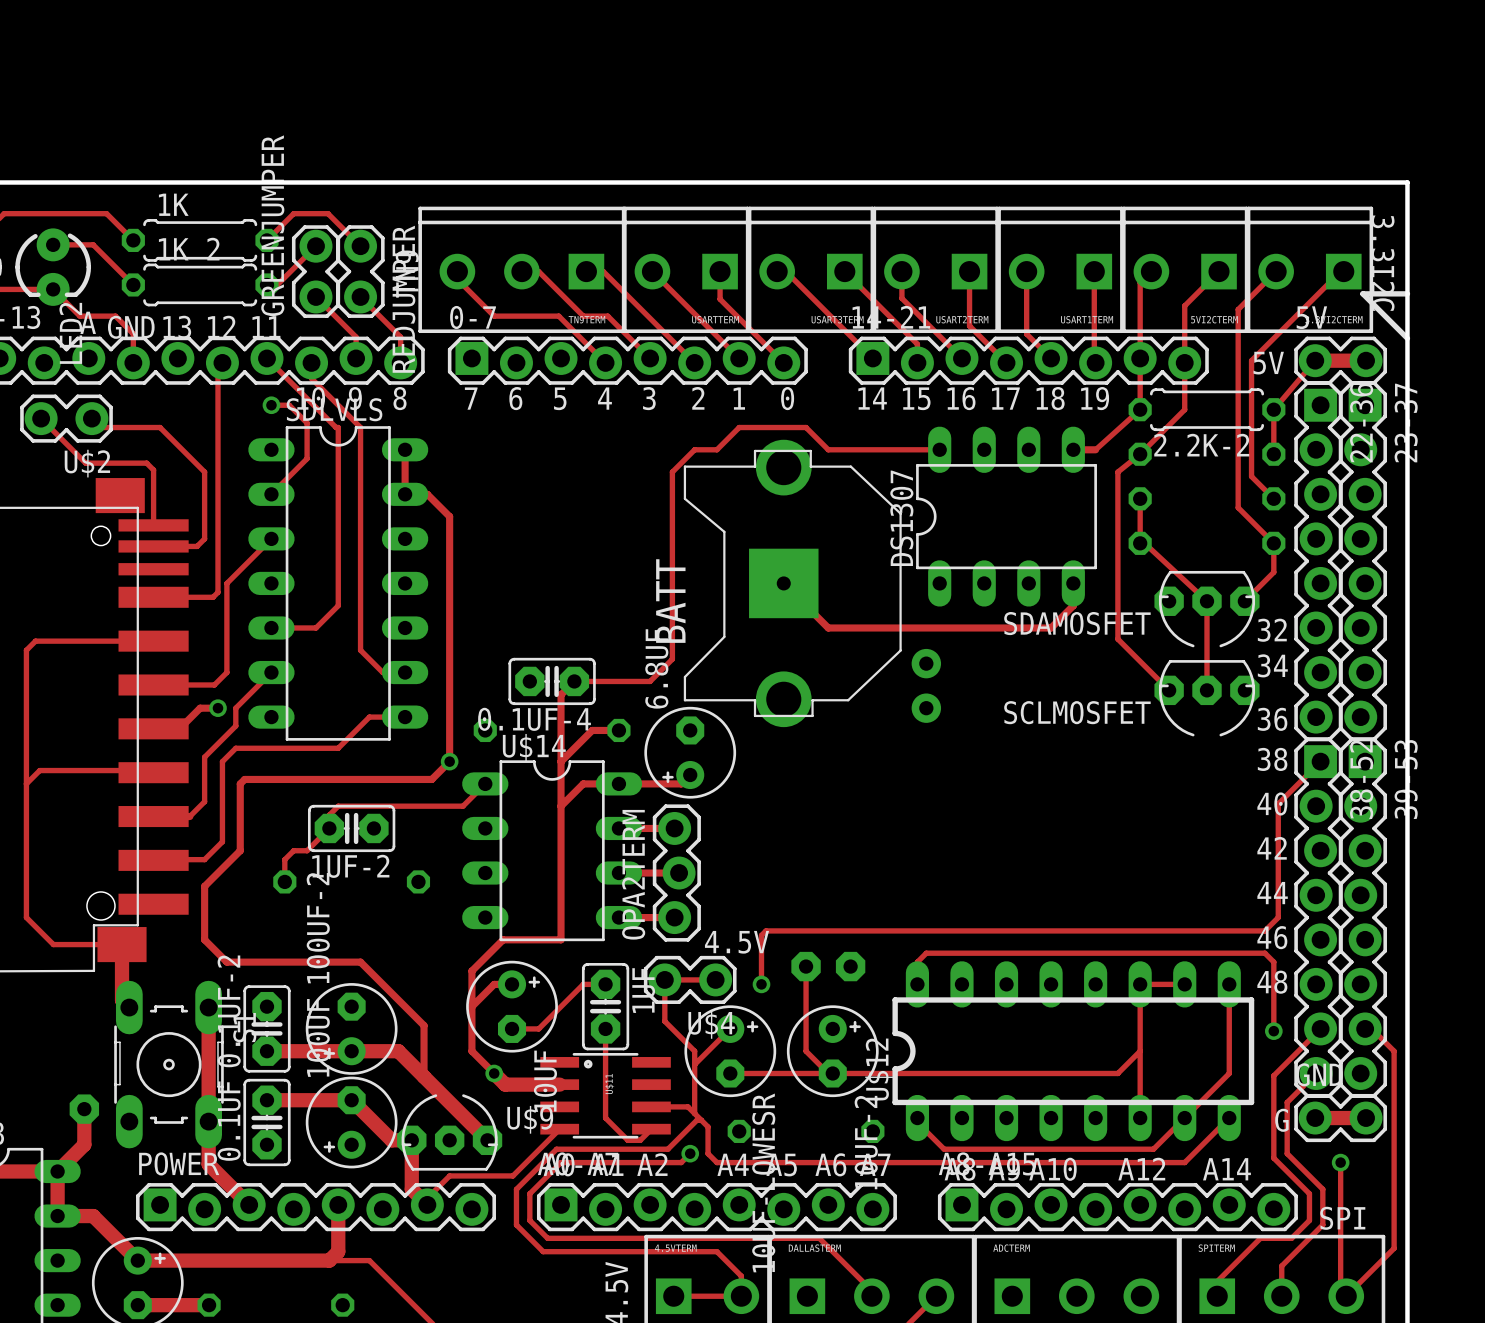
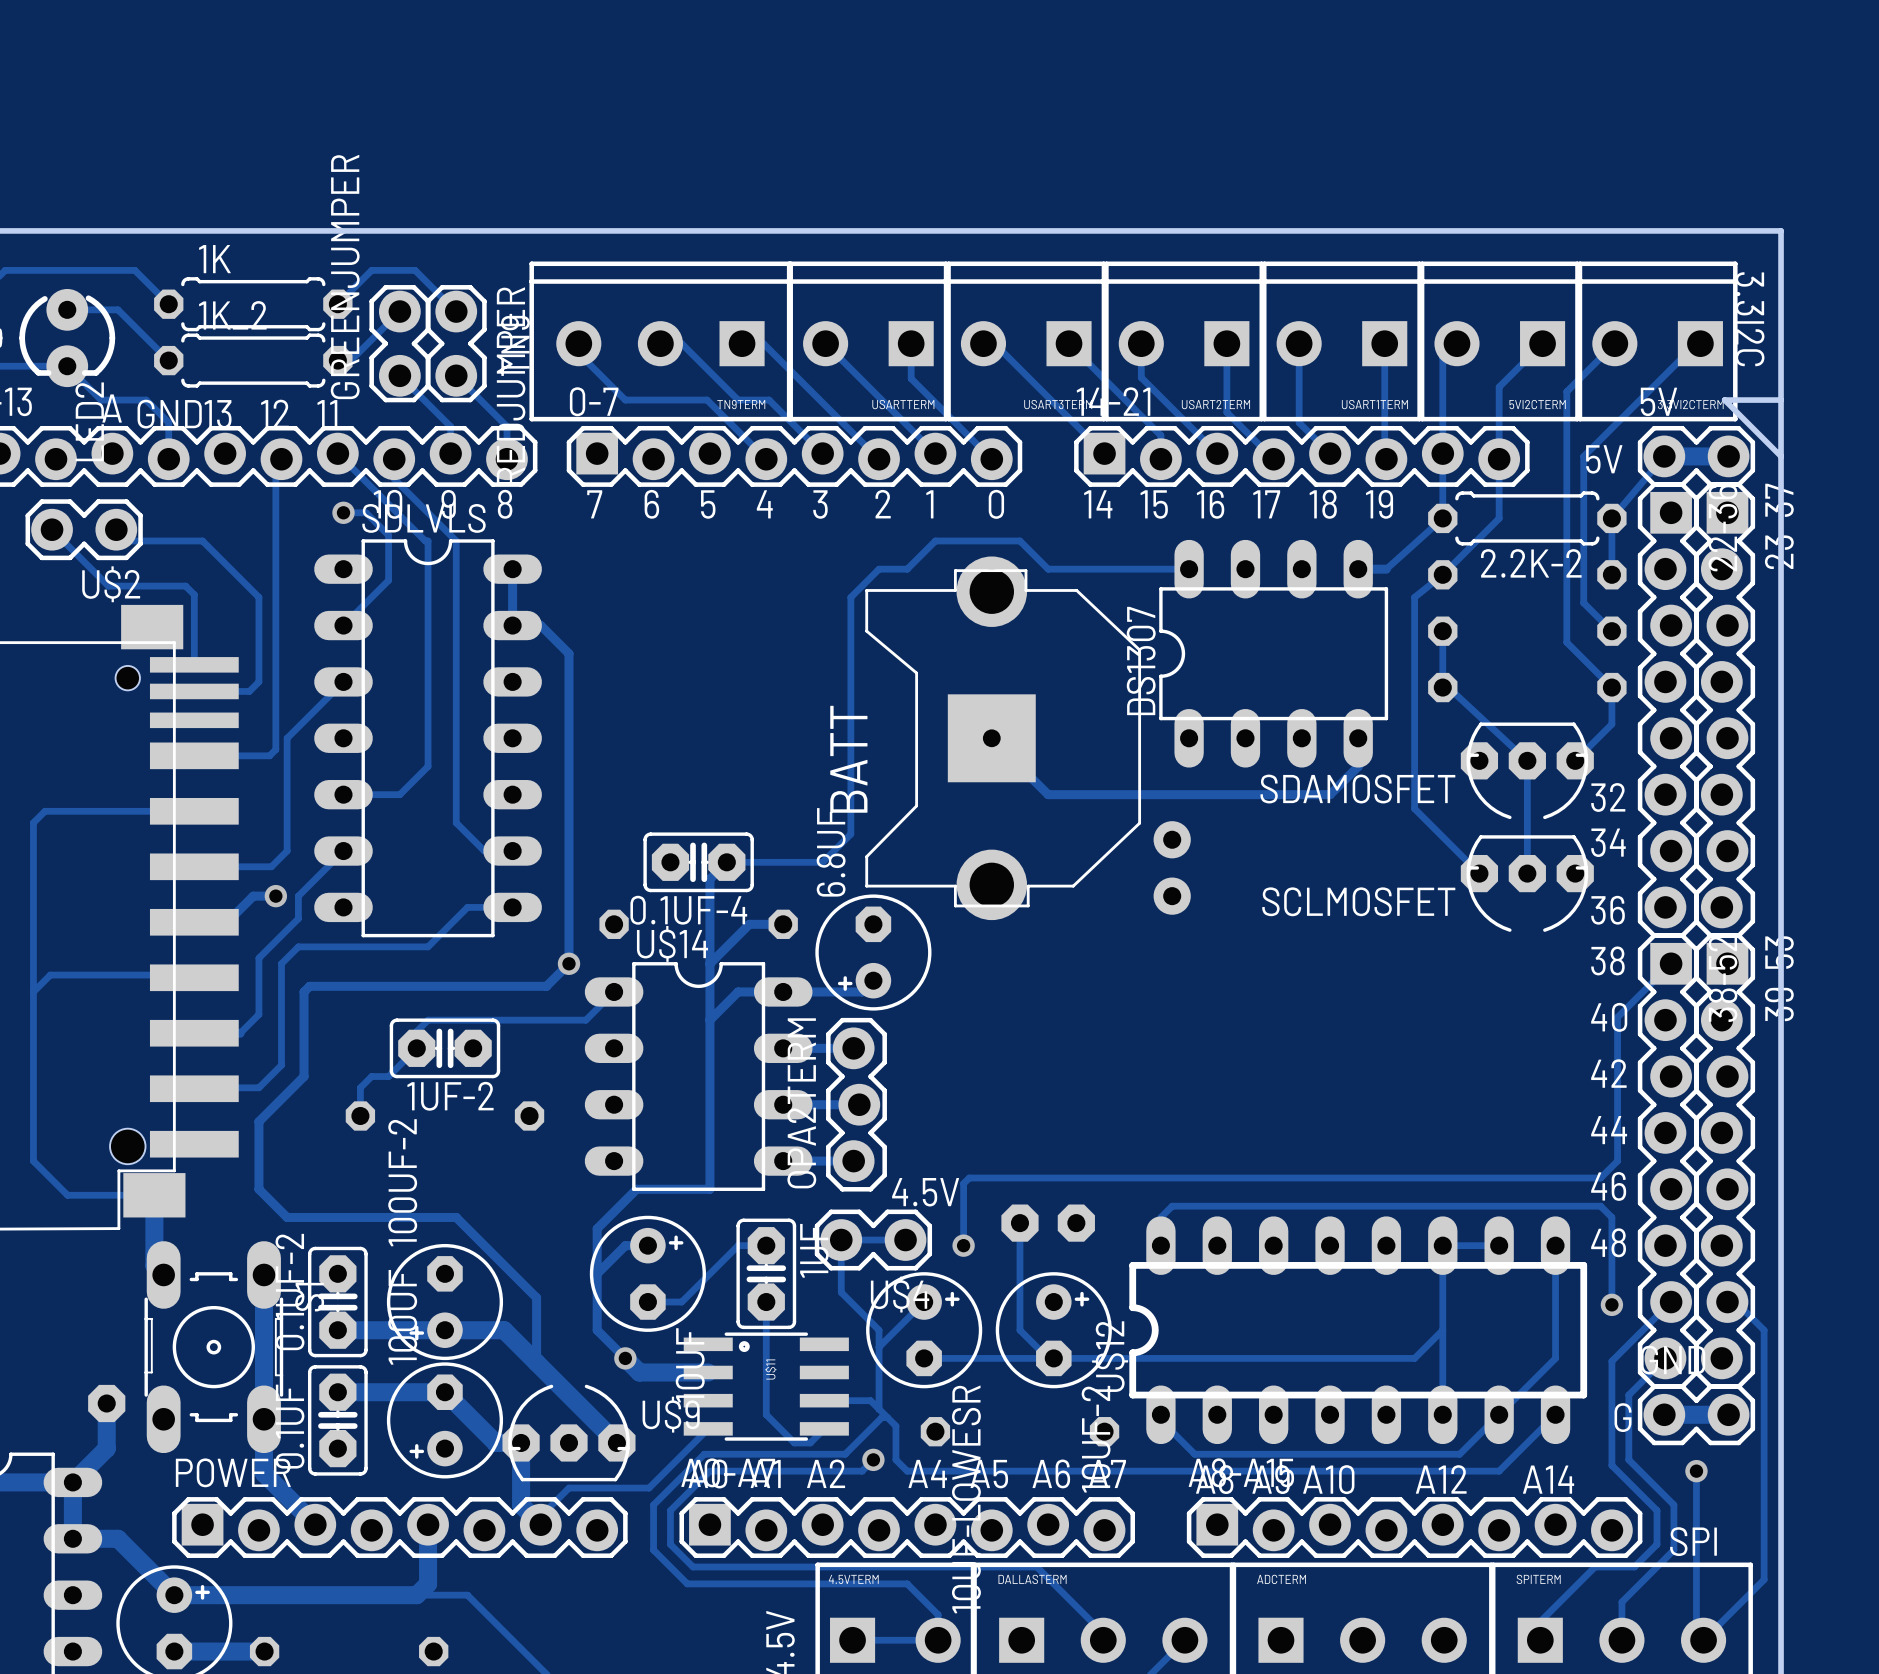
line: (1407, 293) (1362, 293) (1407, 338) -> none
board edge: none -> (1781, 400) (1724, 400) (1781, 456)

